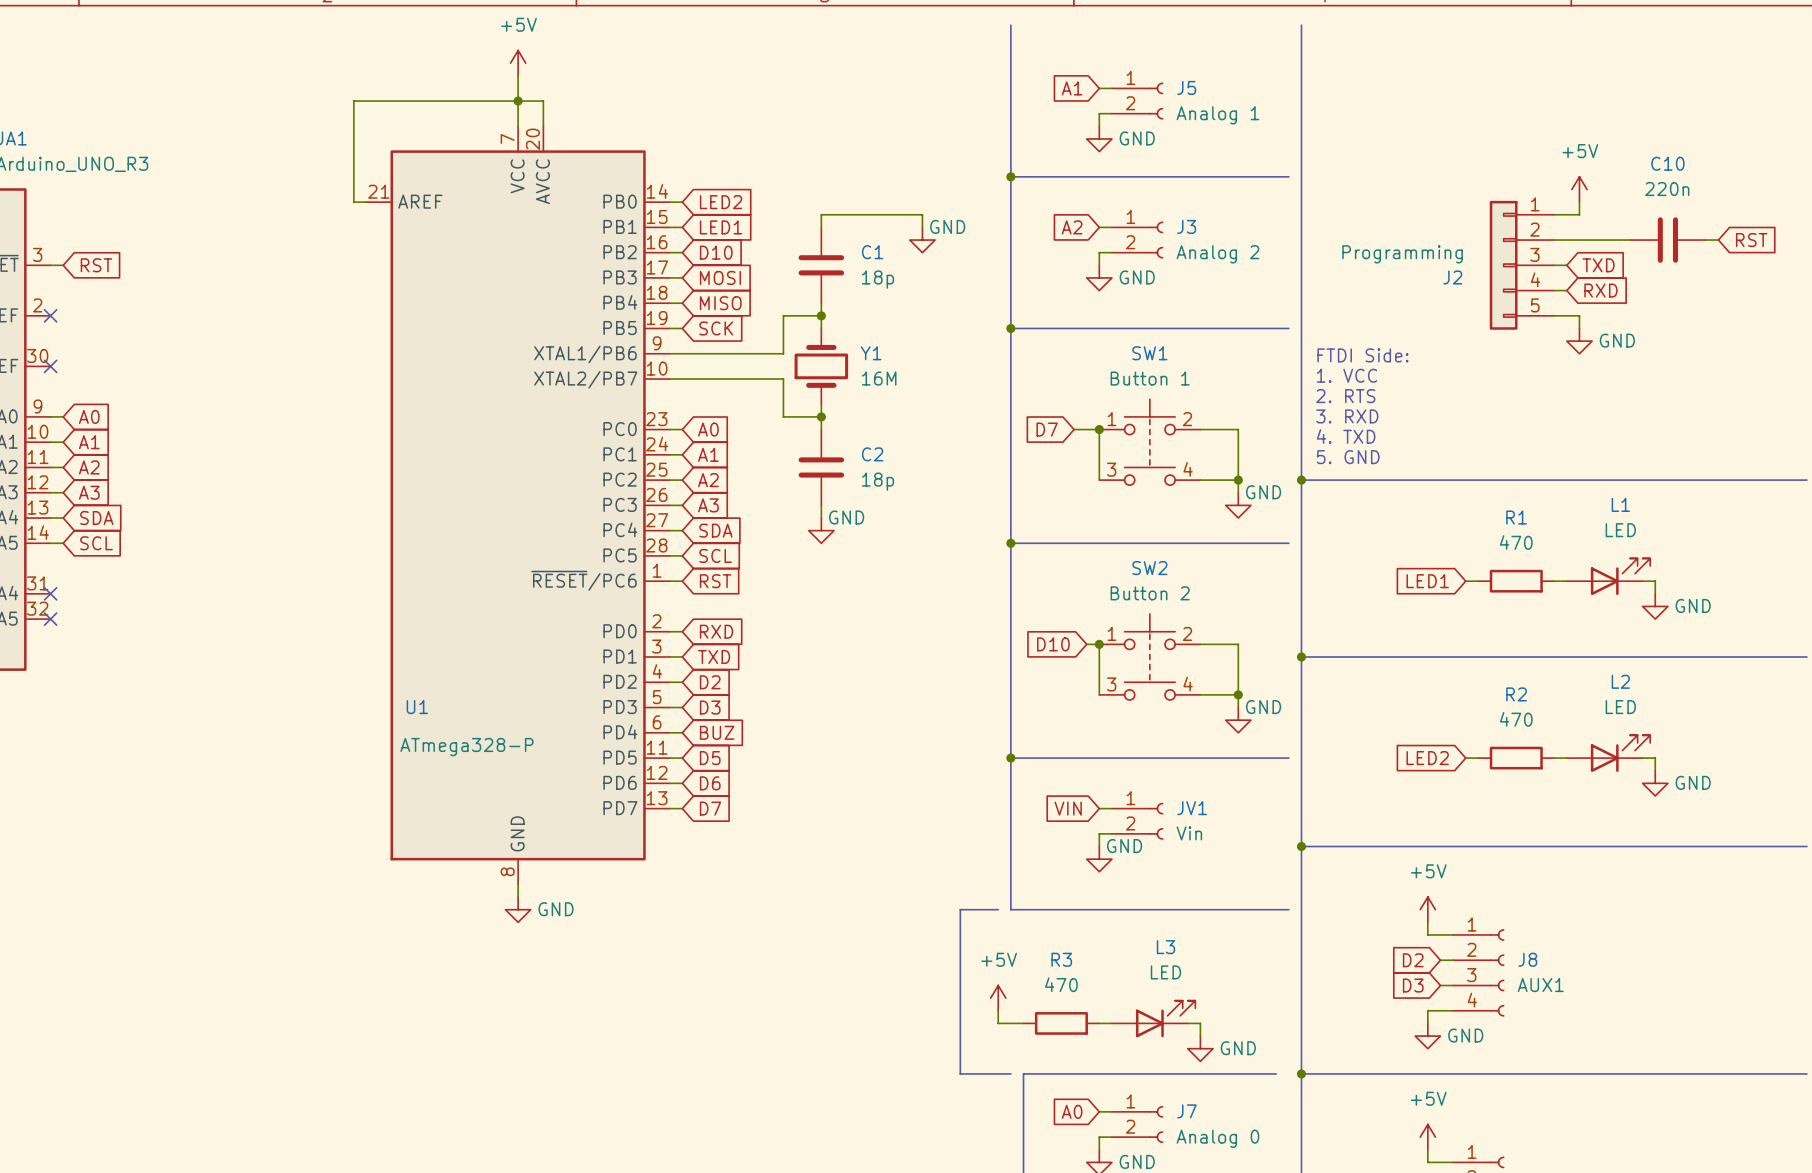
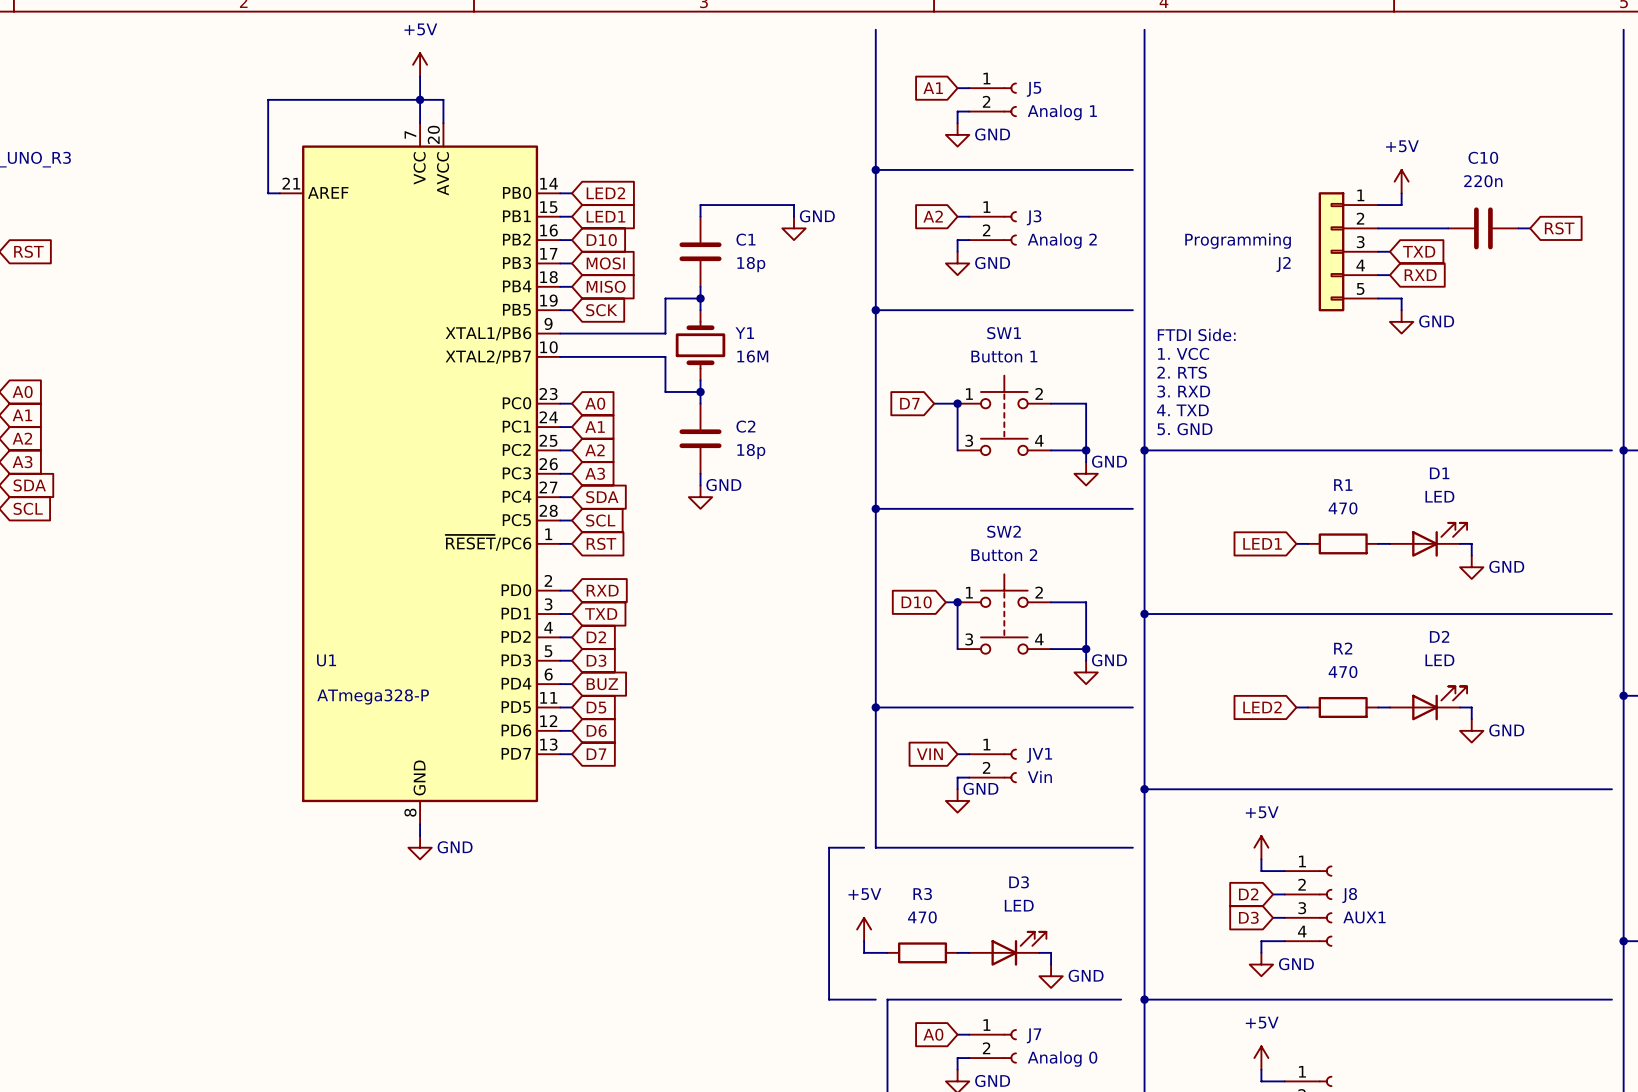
L1 name: L1 (1620, 504) -> D1 (1439, 473)
L2 name: L2 (1620, 681) -> D2 (1439, 636)
L3 name: L3 (1165, 947) -> D3 (1019, 882)

